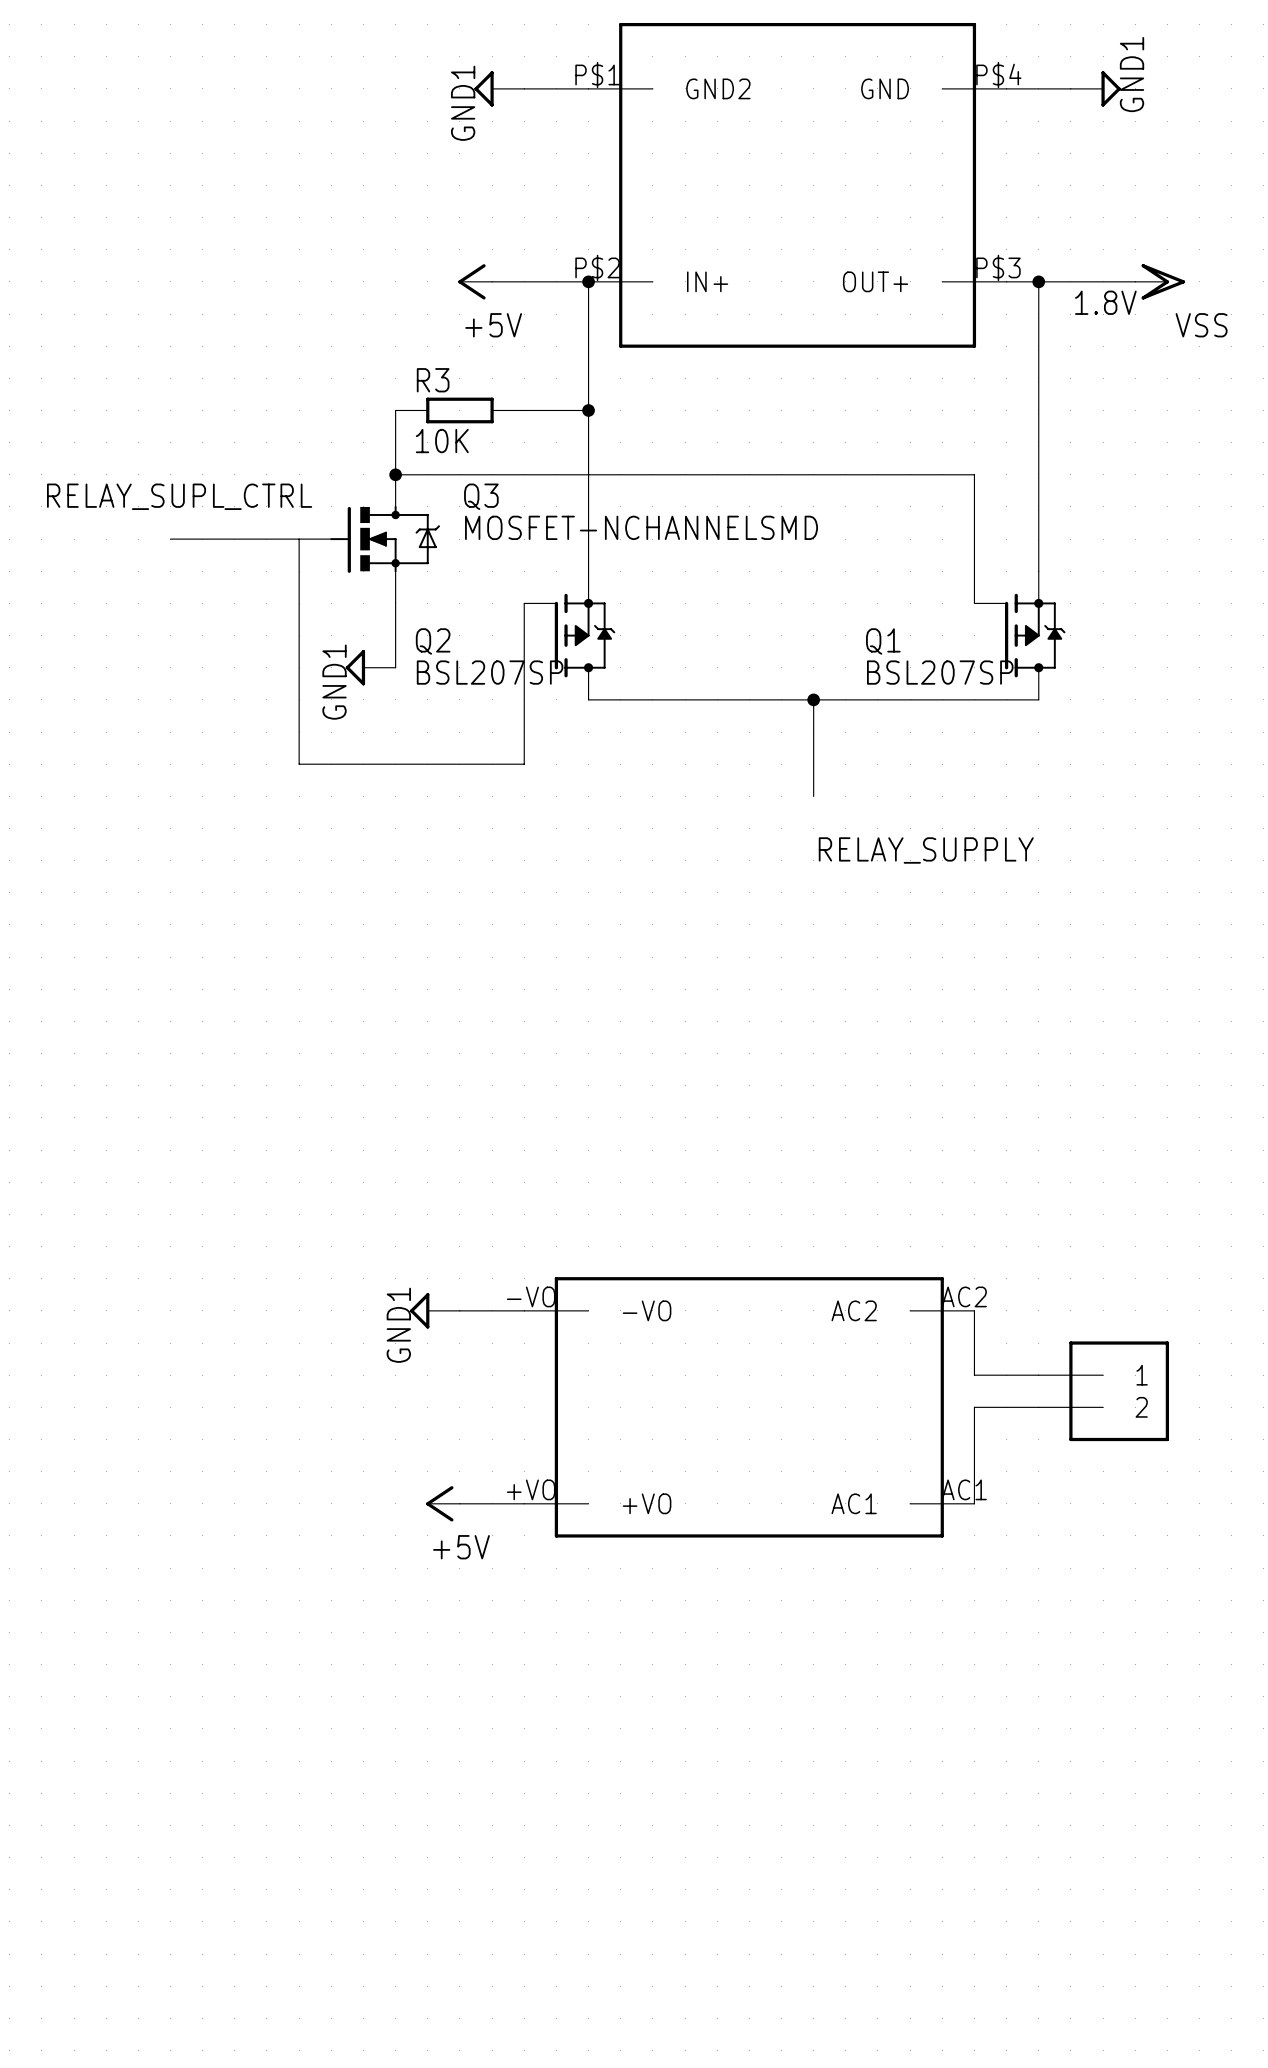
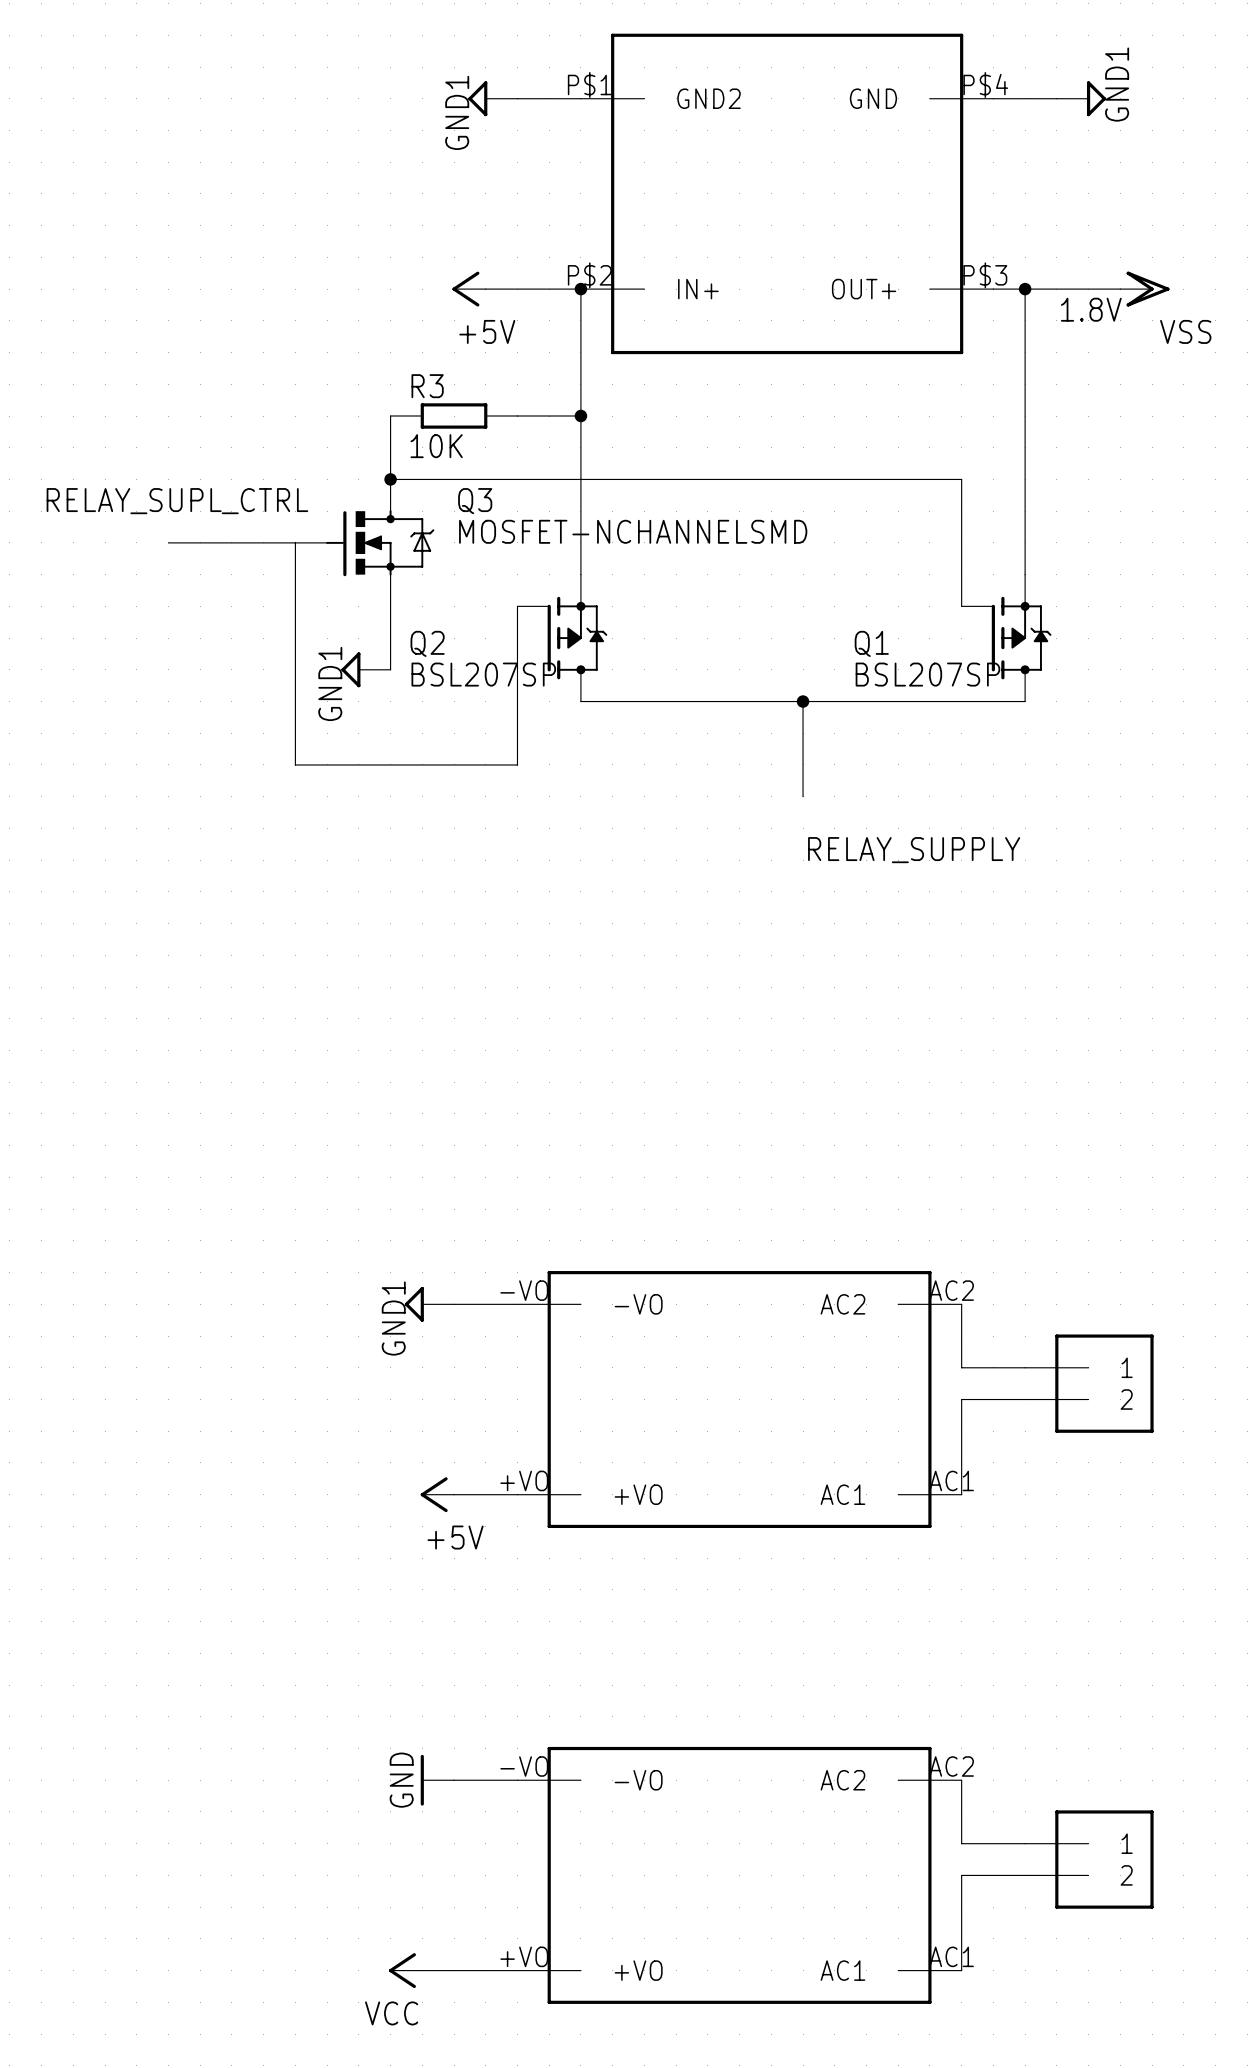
power symbol: none -> GND (437, 1780)
wire: none -> (454, 1780) (517, 1780)
wire: none -> (961, 1780) (961, 1843) (1025, 1843)
part: none -> (1089, 1859)
part: none -> (739, 1875)
wire: none -> (1025, 1875) (961, 1875) (961, 1970)
power symbol: none -> VCC (405, 1970)
wire: none -> (422, 1970) (517, 1970)

